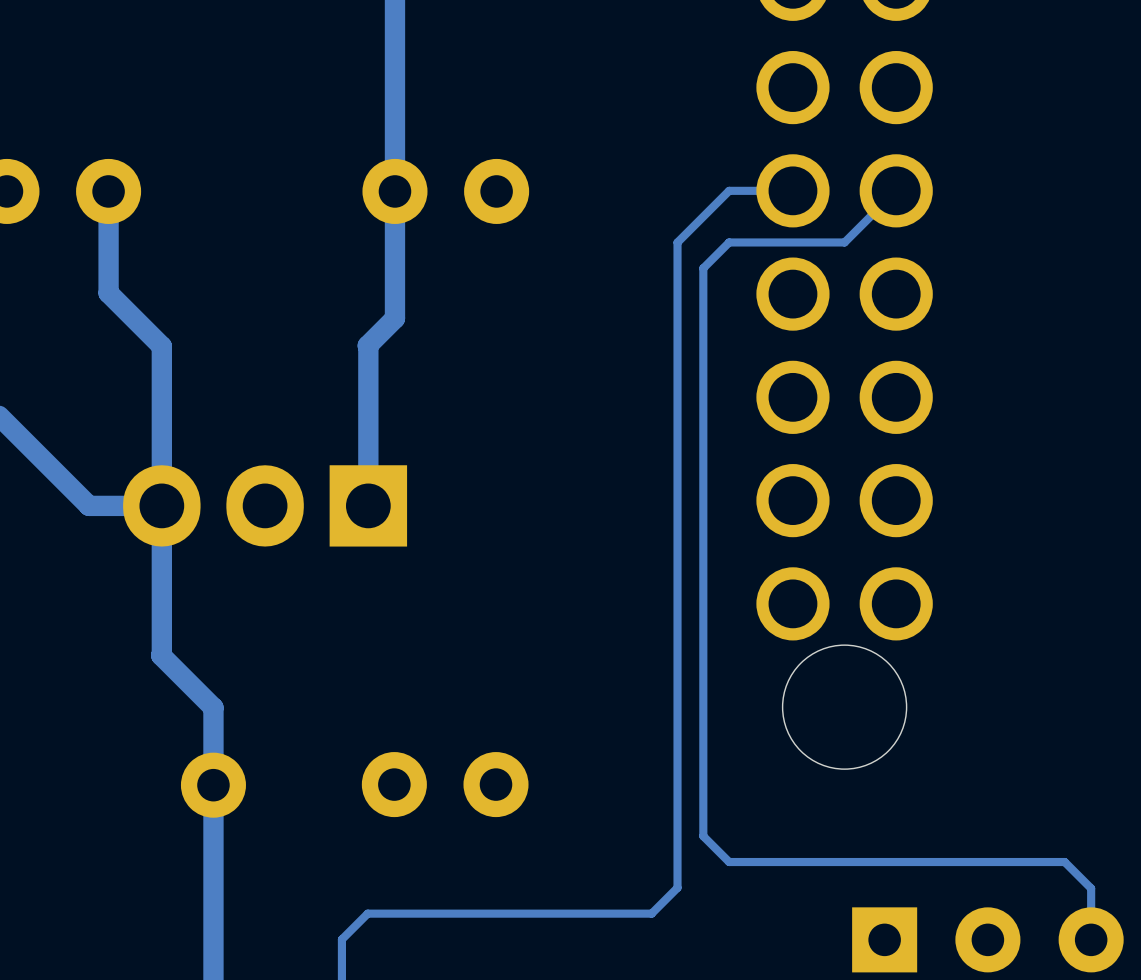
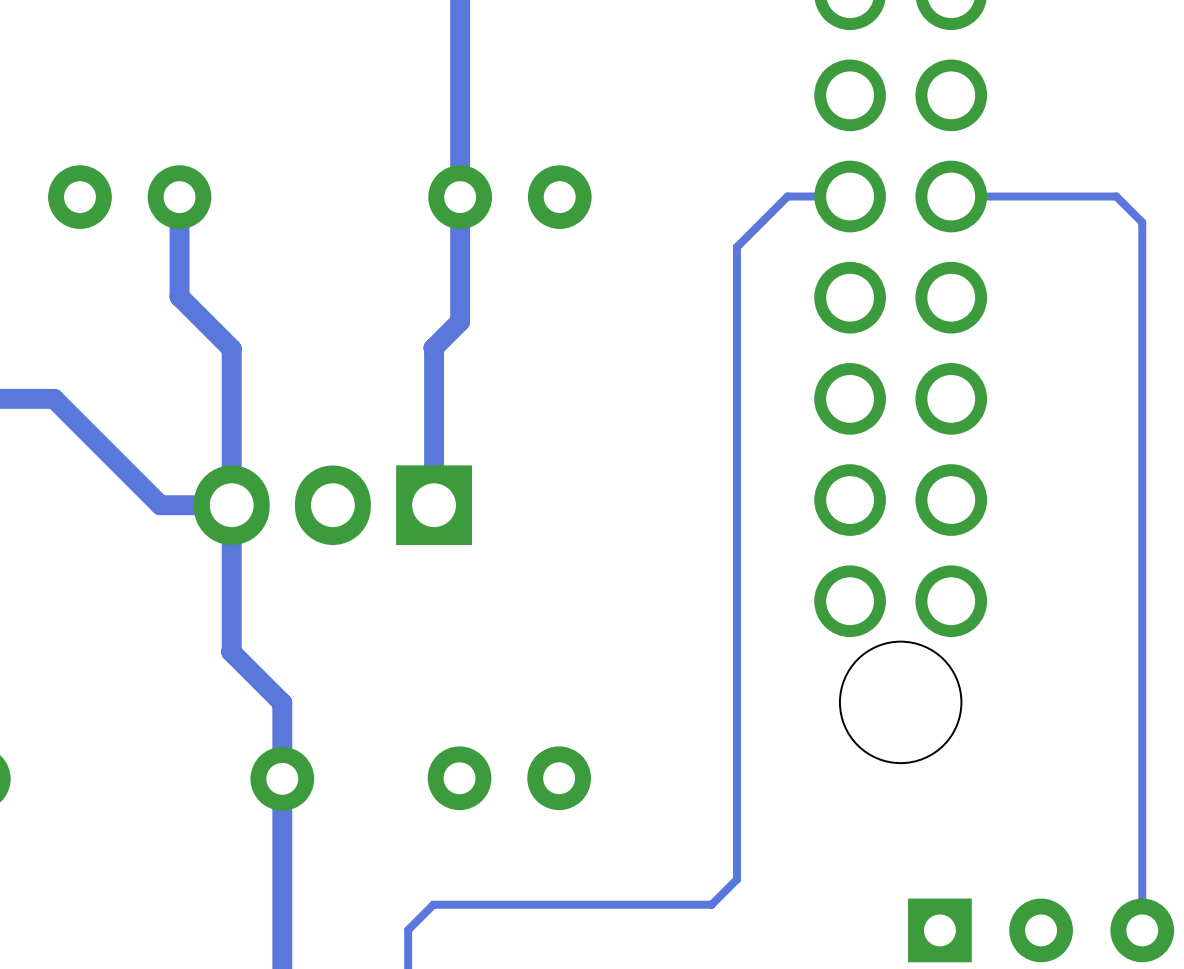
track: (896, 190) (844, 242) (729, 242) (703, 268) (703, 836) (729, 862) (1064, 862) (1091, 888) -> (951, 196) (1116, 196) (1142, 222) (1142, 880)

